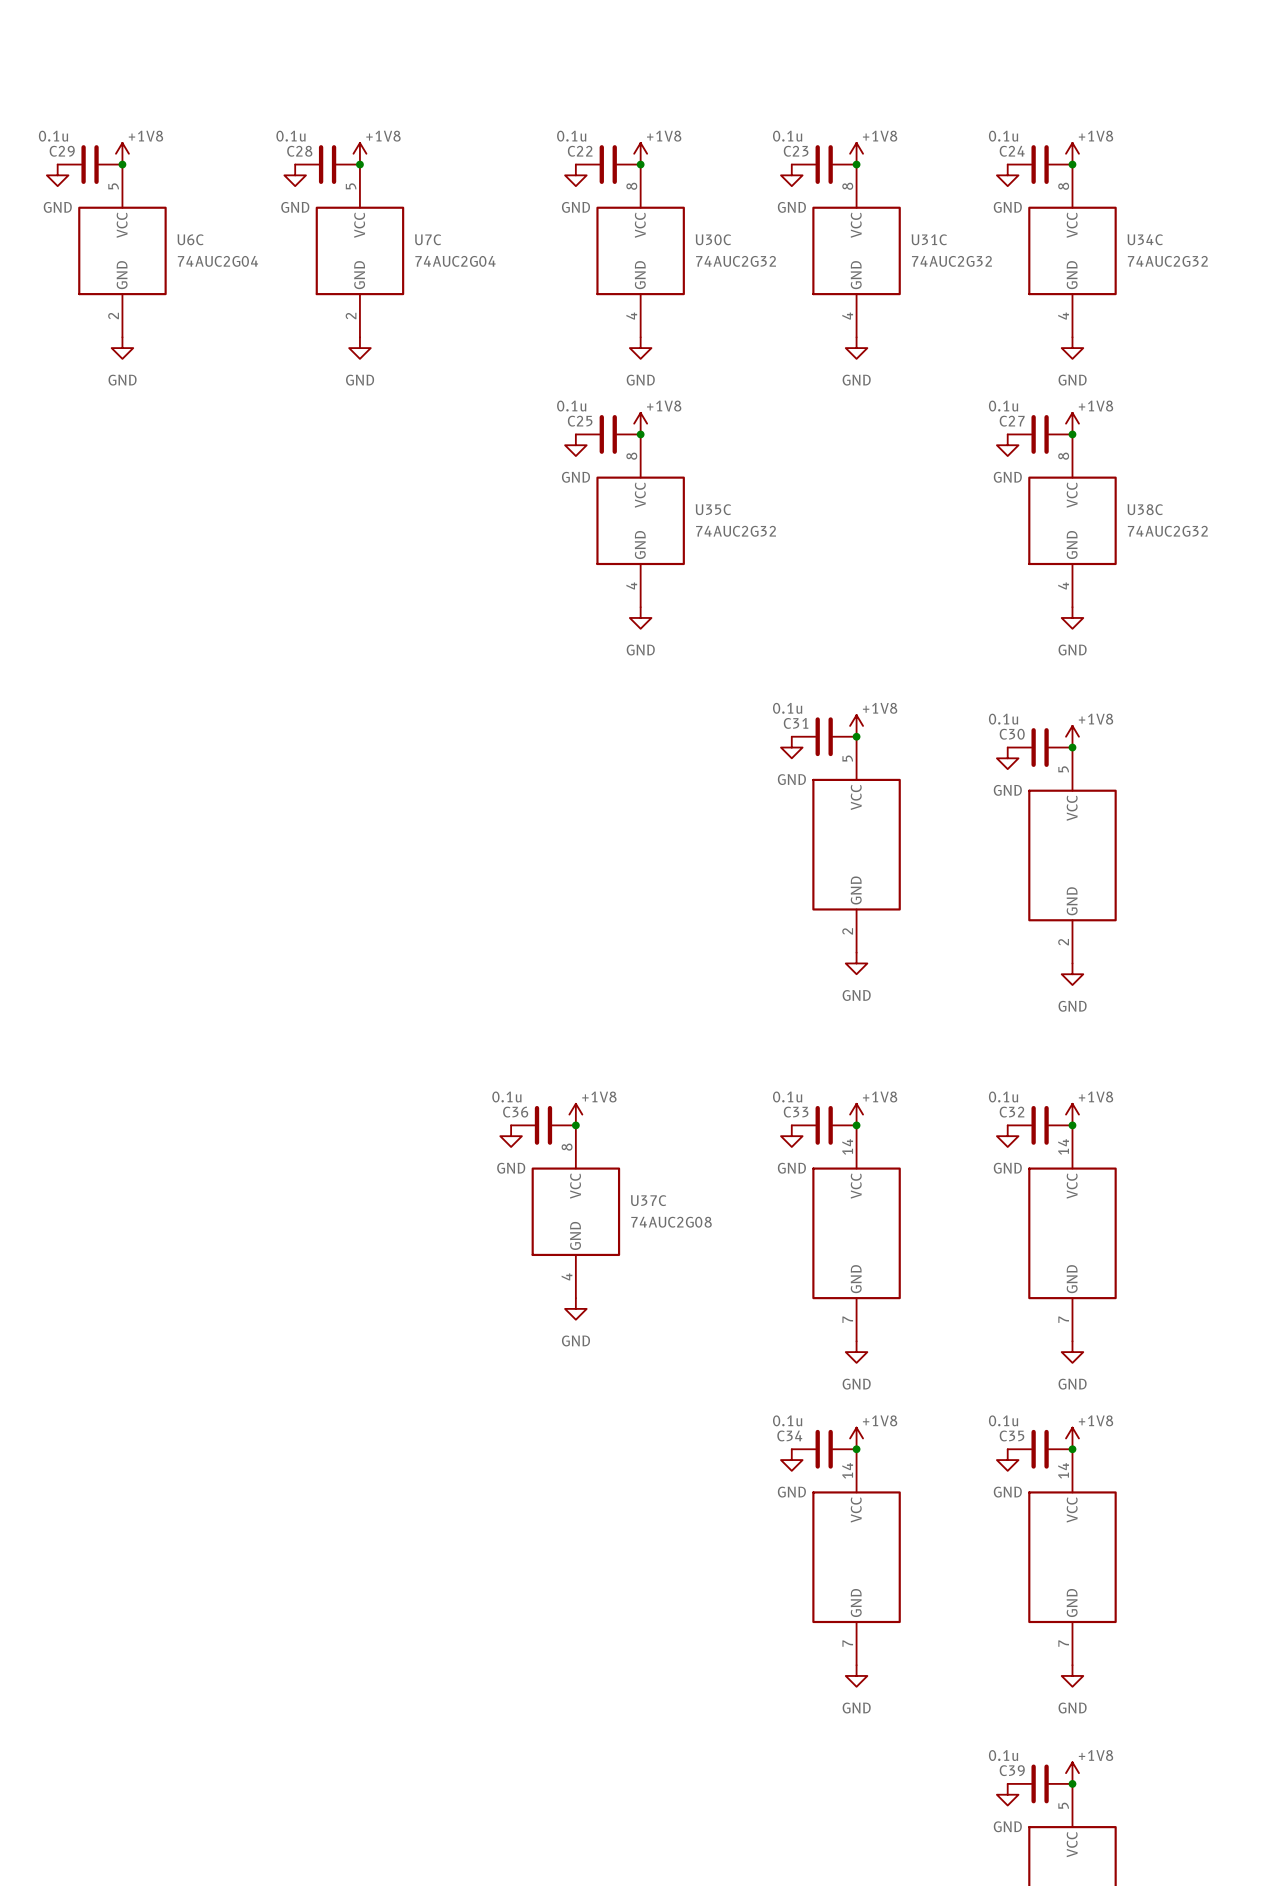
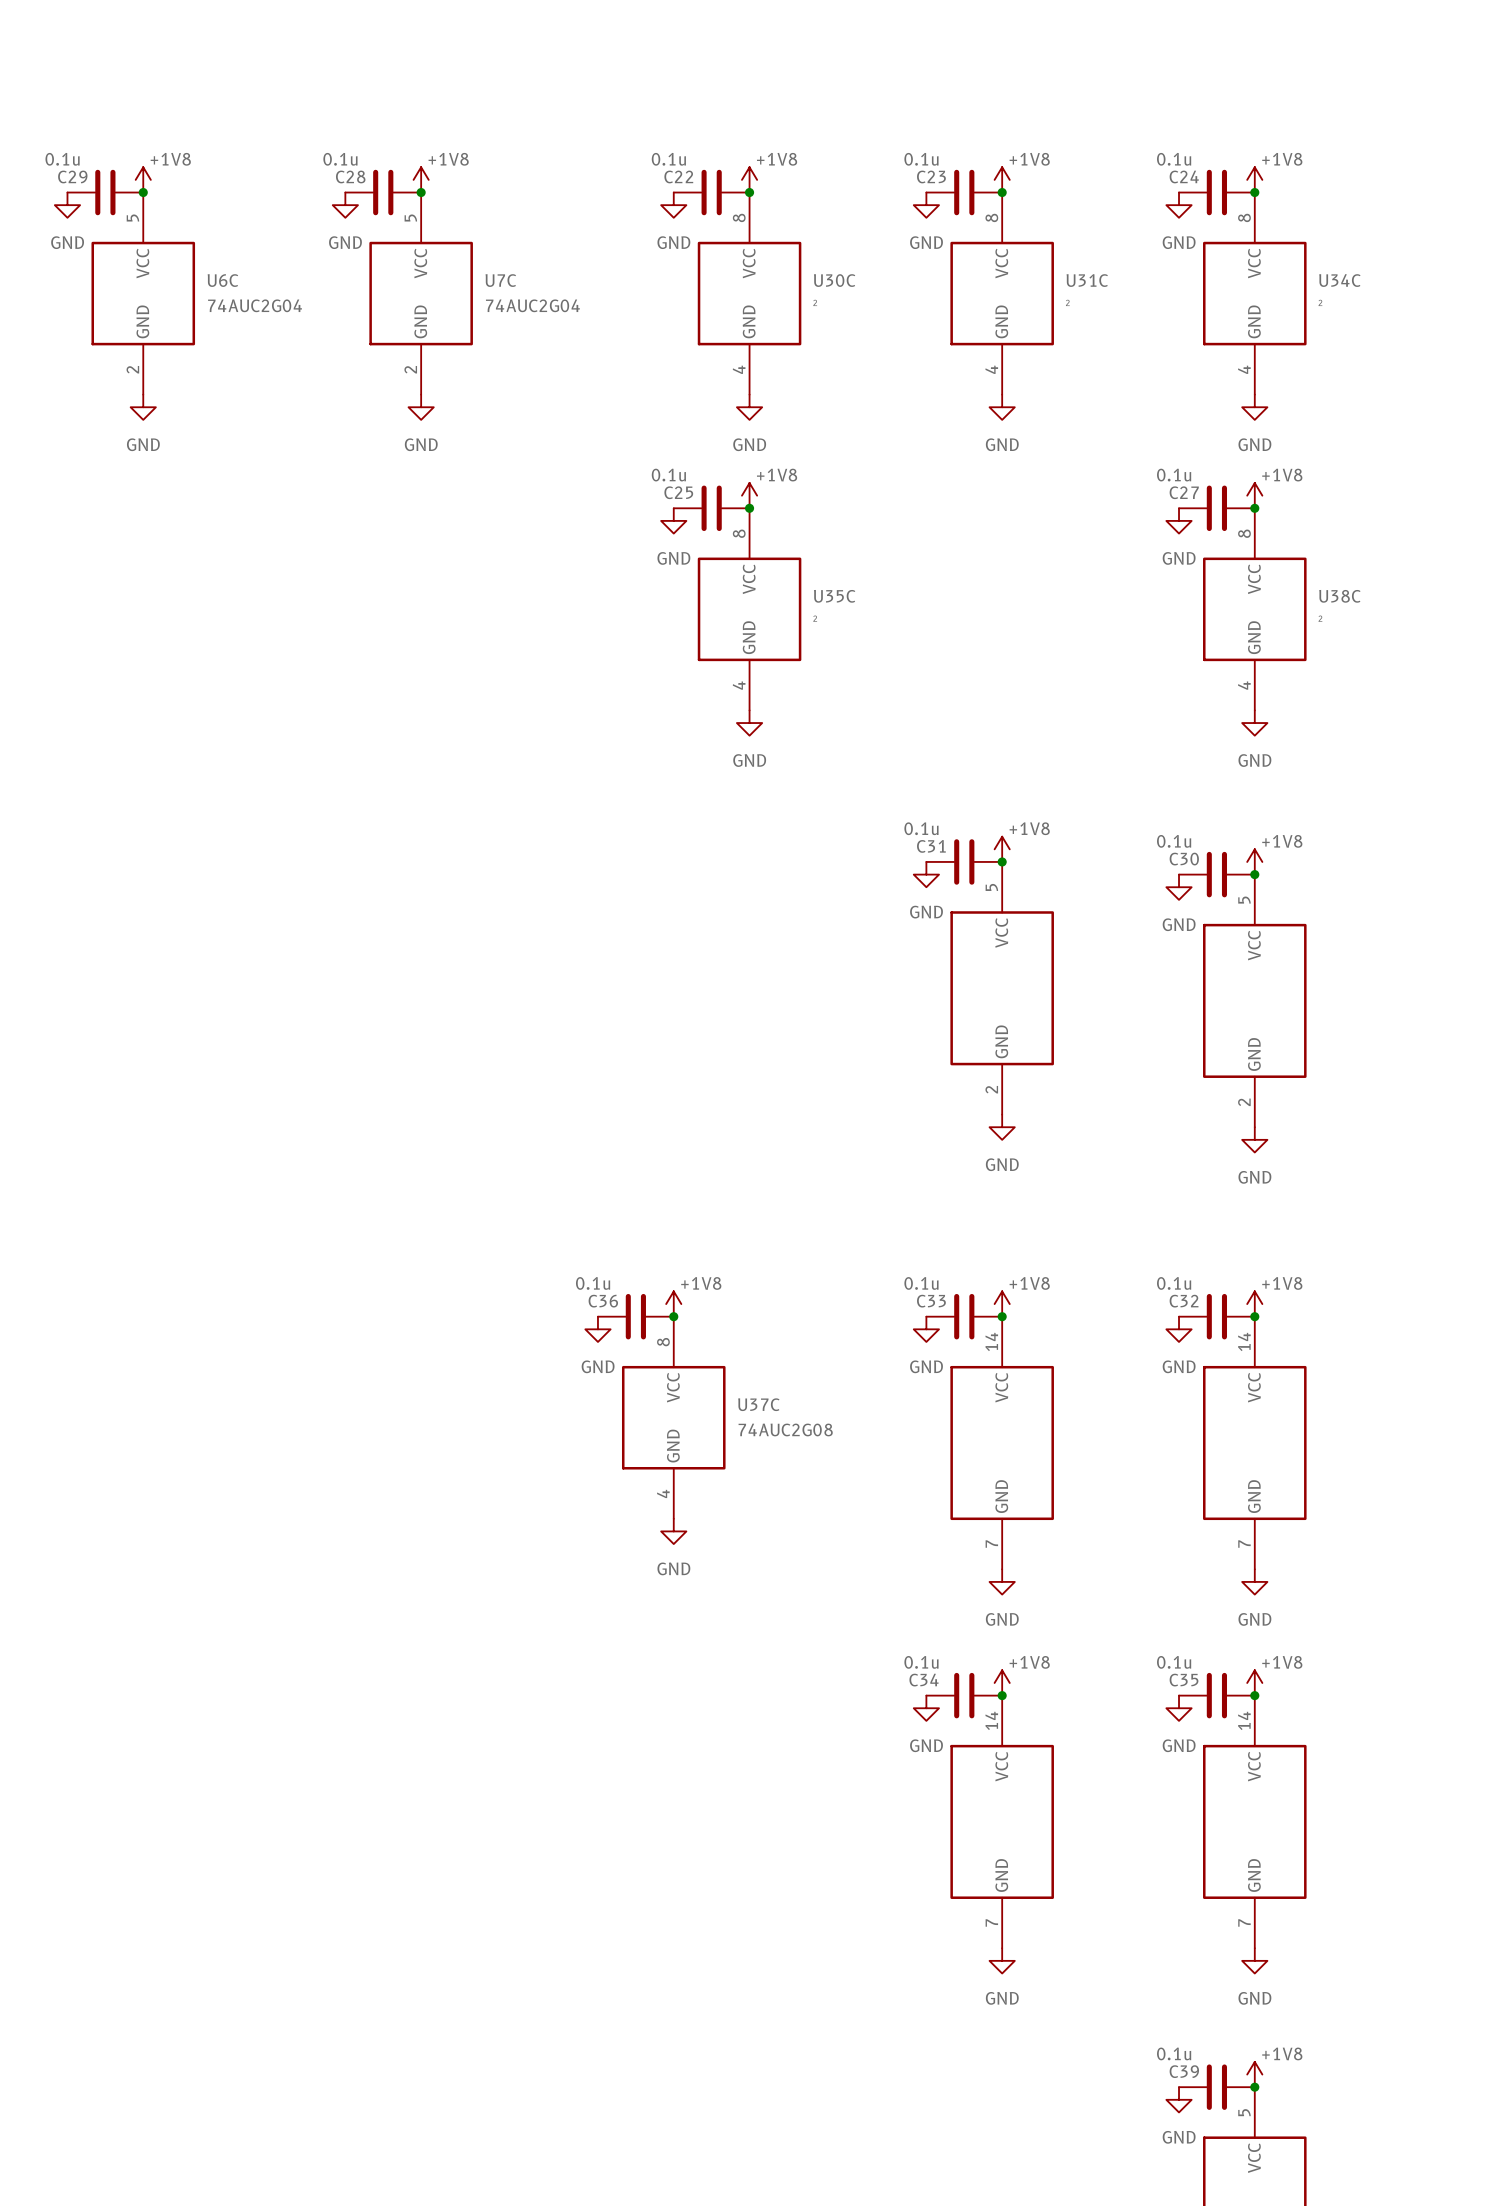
U30C value: 74AUC2G32 (736, 261) -> ² (815, 302)
U31C value: 74AUC2G32 (951, 261) -> ² (1067, 302)
U34C value: 74AUC2G32 (1167, 261) -> ² (1320, 302)
U35C value: 74AUC2G32 (736, 531) -> ² (815, 618)
U38C value: 74AUC2G32 (1167, 531) -> ² (1320, 618)

